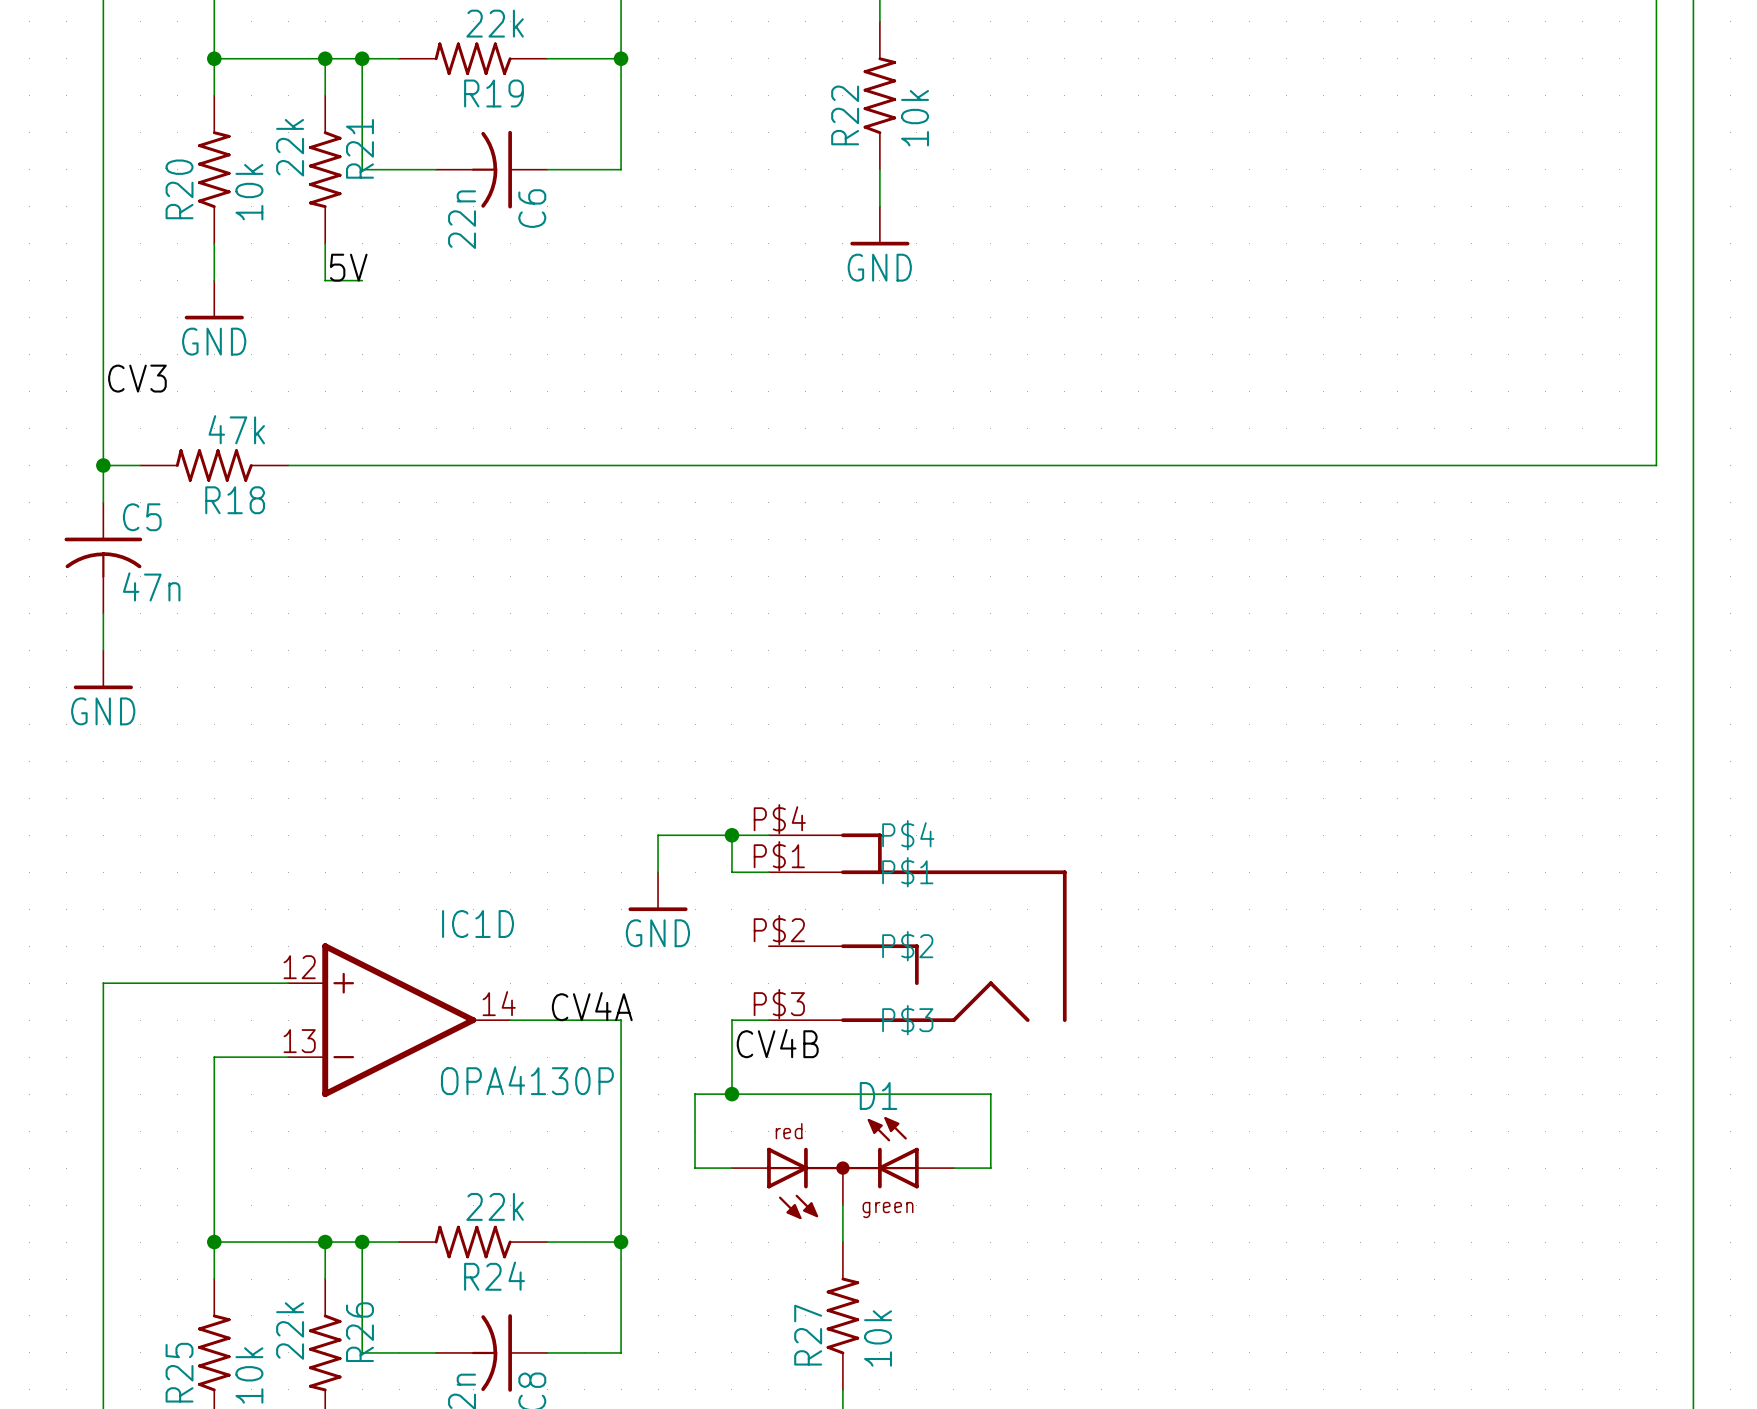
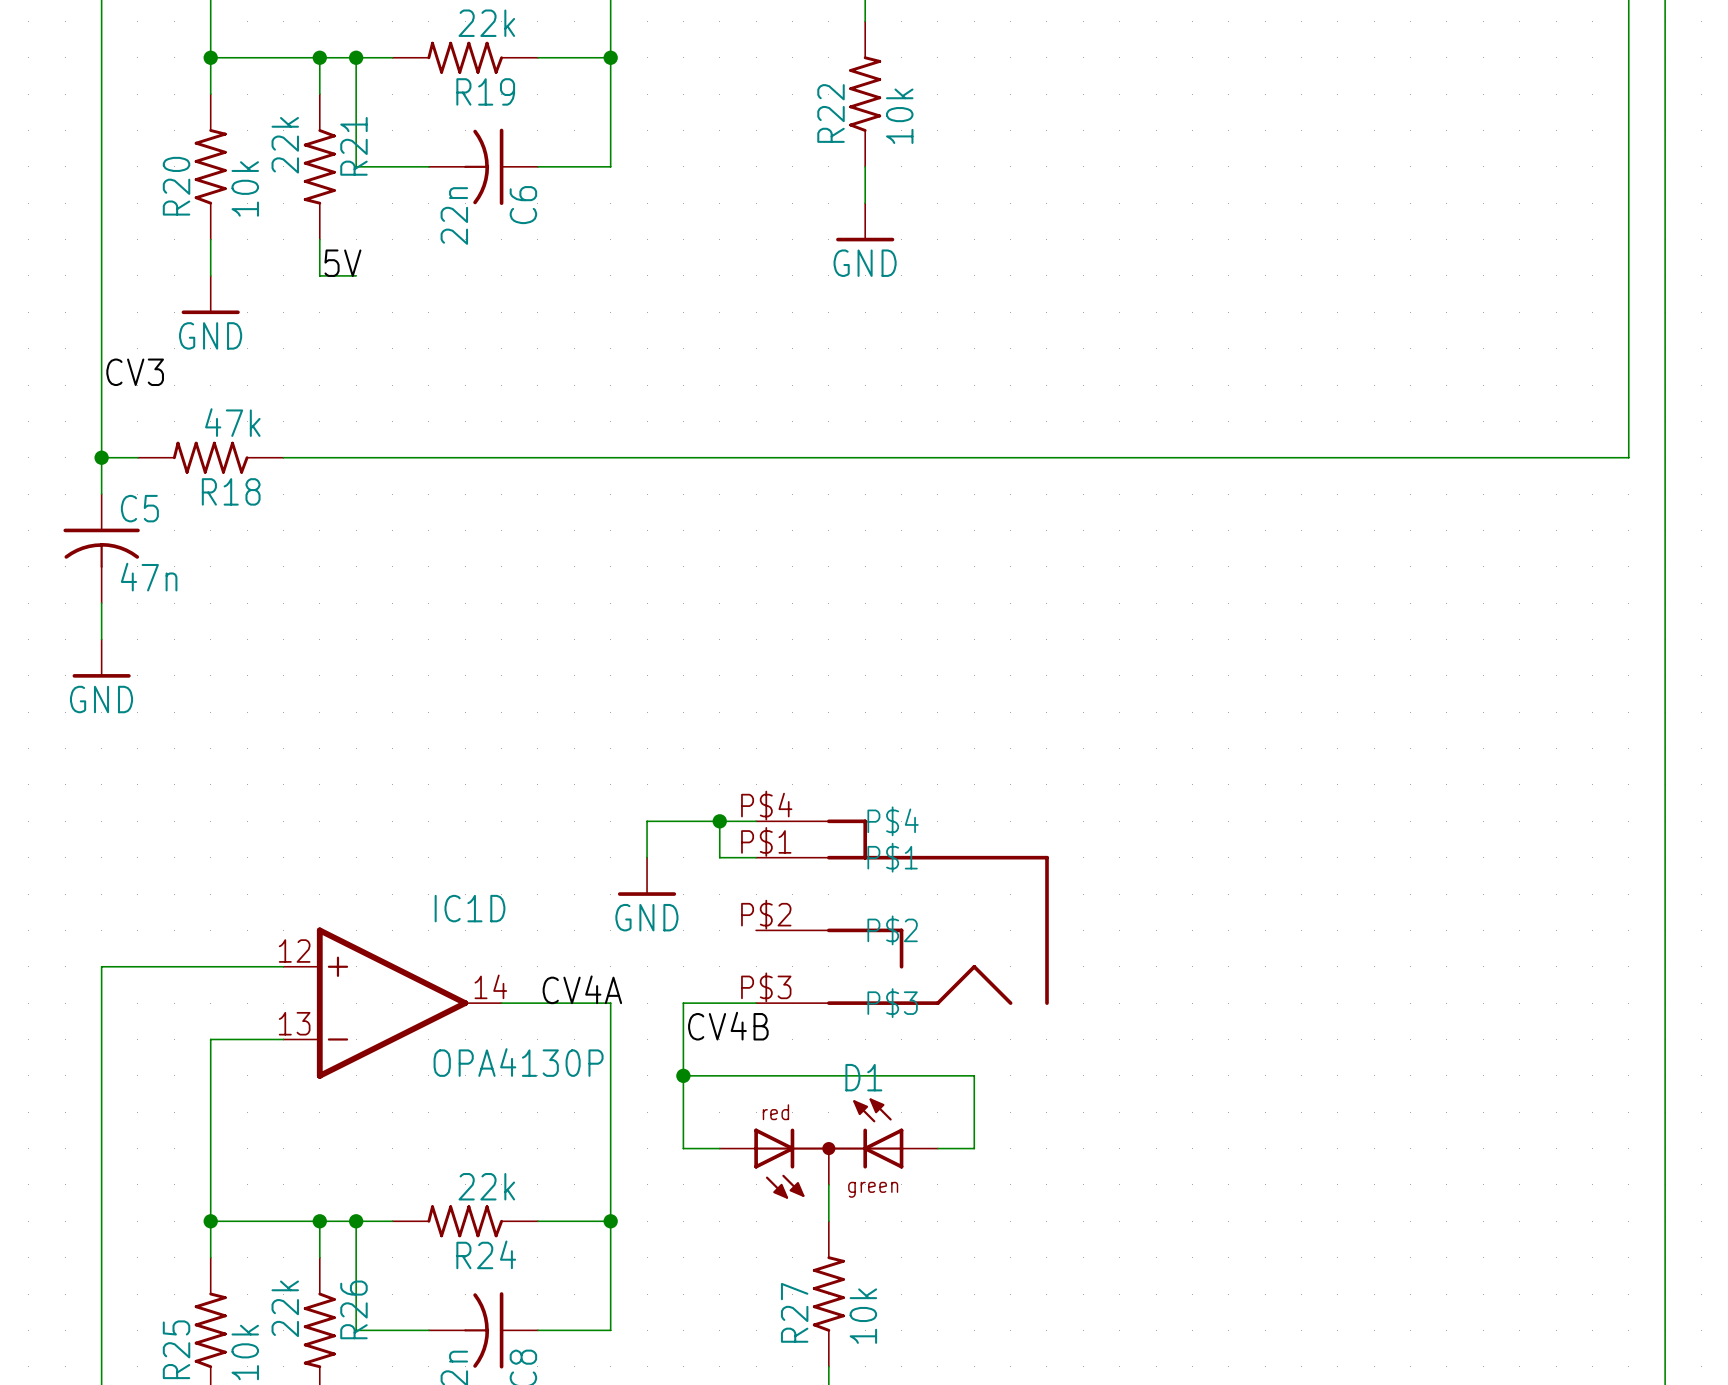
wire: (731, 1020) (731, 1094) -> (719, 1003) (683, 1003) (683, 1075)
label position: CV4B (777, 1043) -> CV4B (728, 1026)
junction position: (731, 1094) -> (683, 1075)

